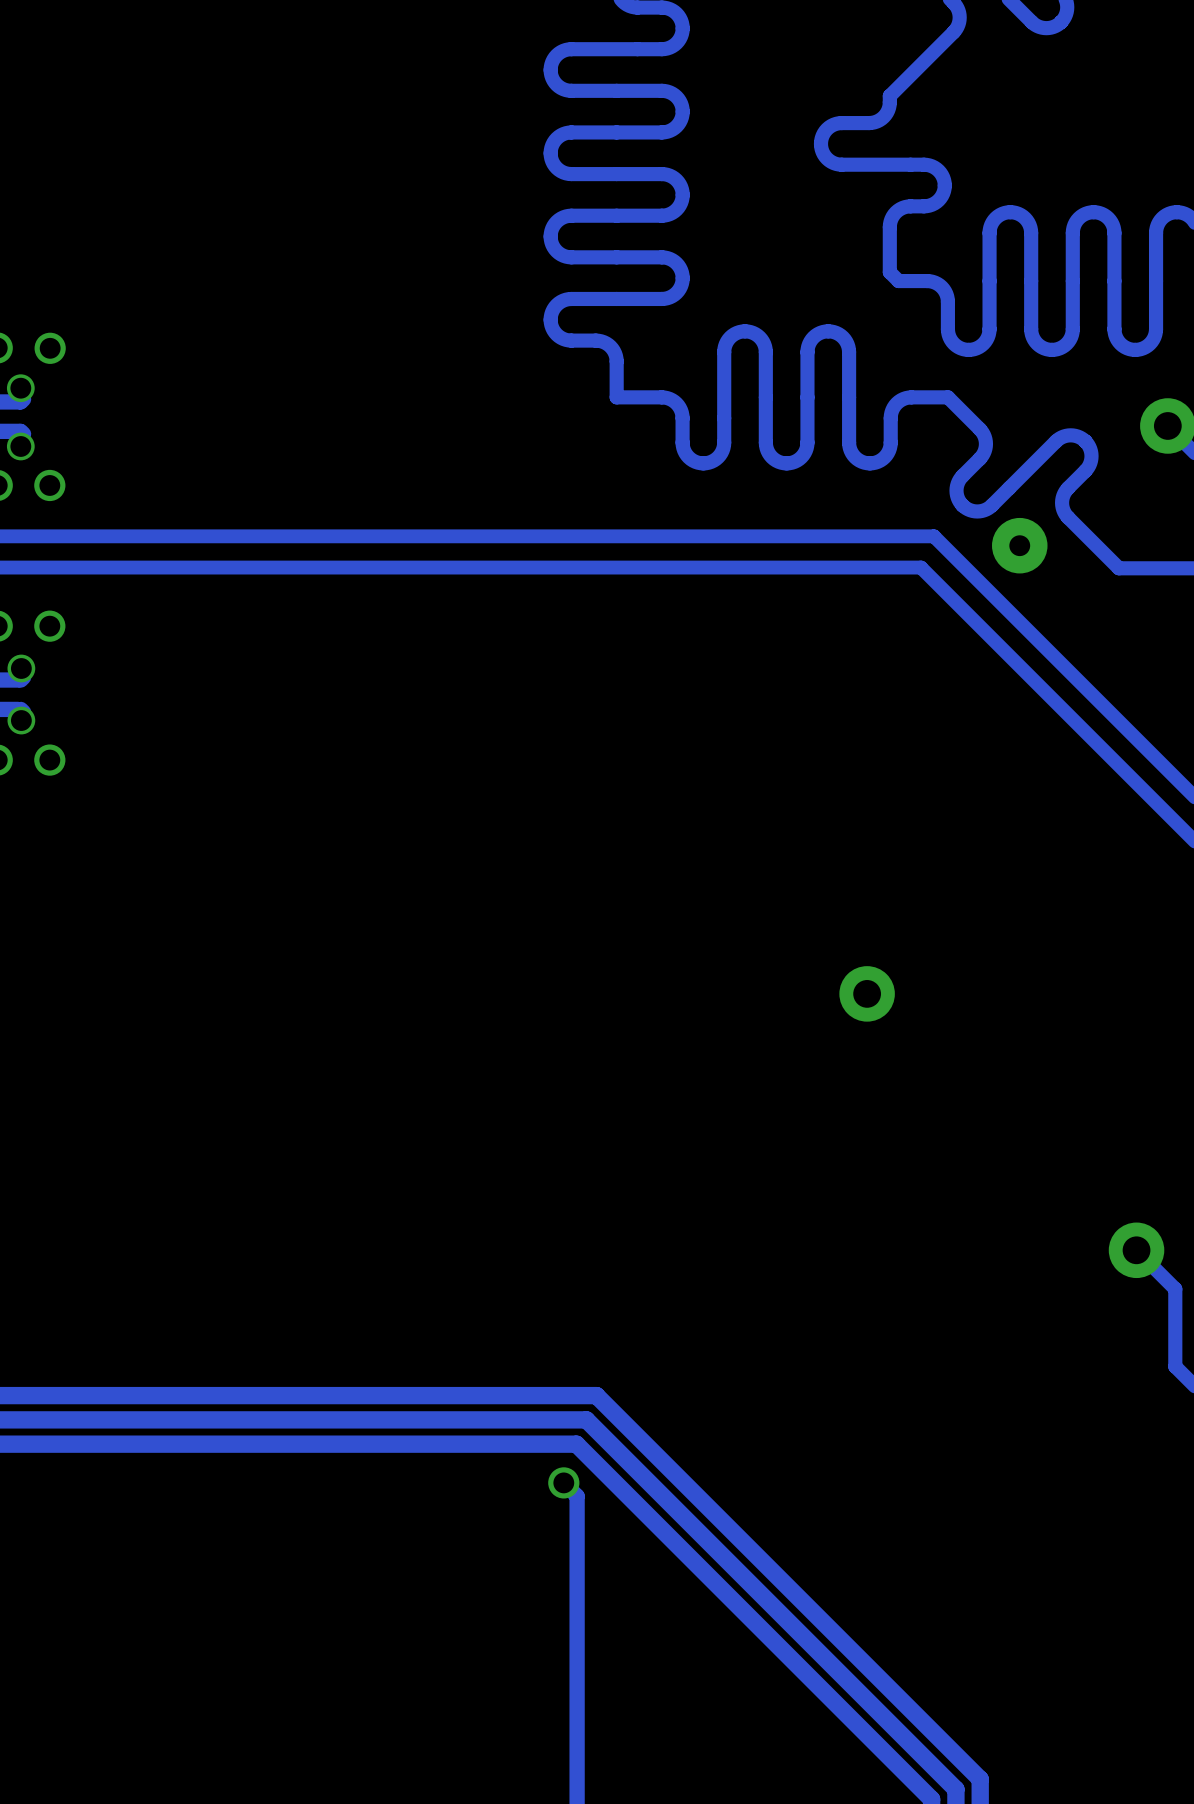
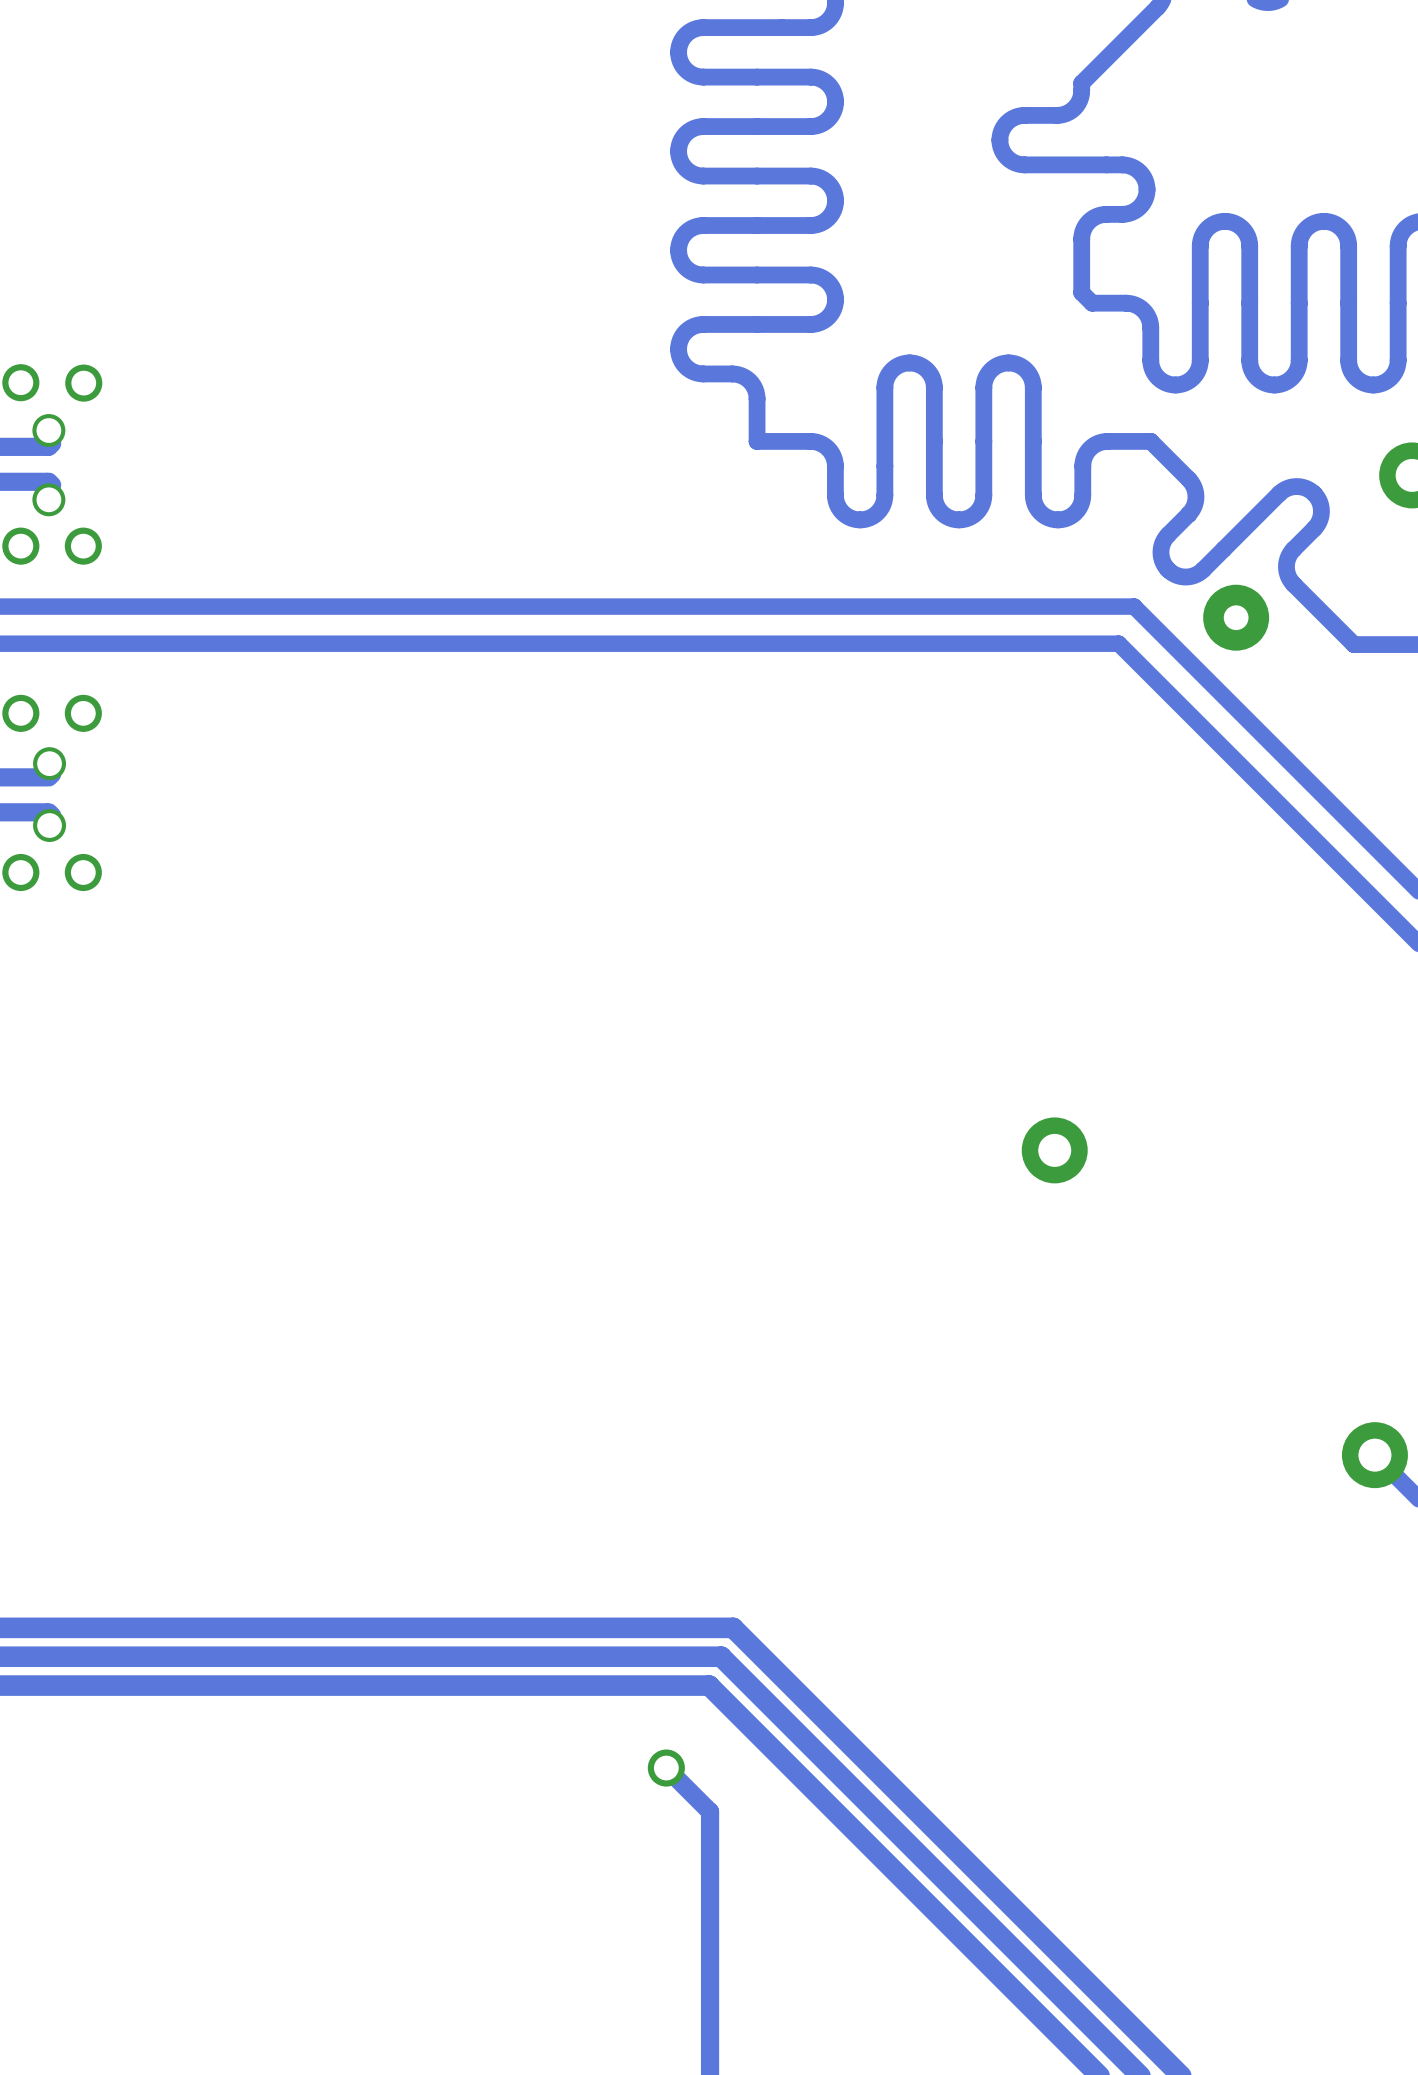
track: (563, 1482) (577, 1496) (577, 1550) -> (666, 1768) (710, 1811)
via position: (563, 1482) -> (666, 1768)

